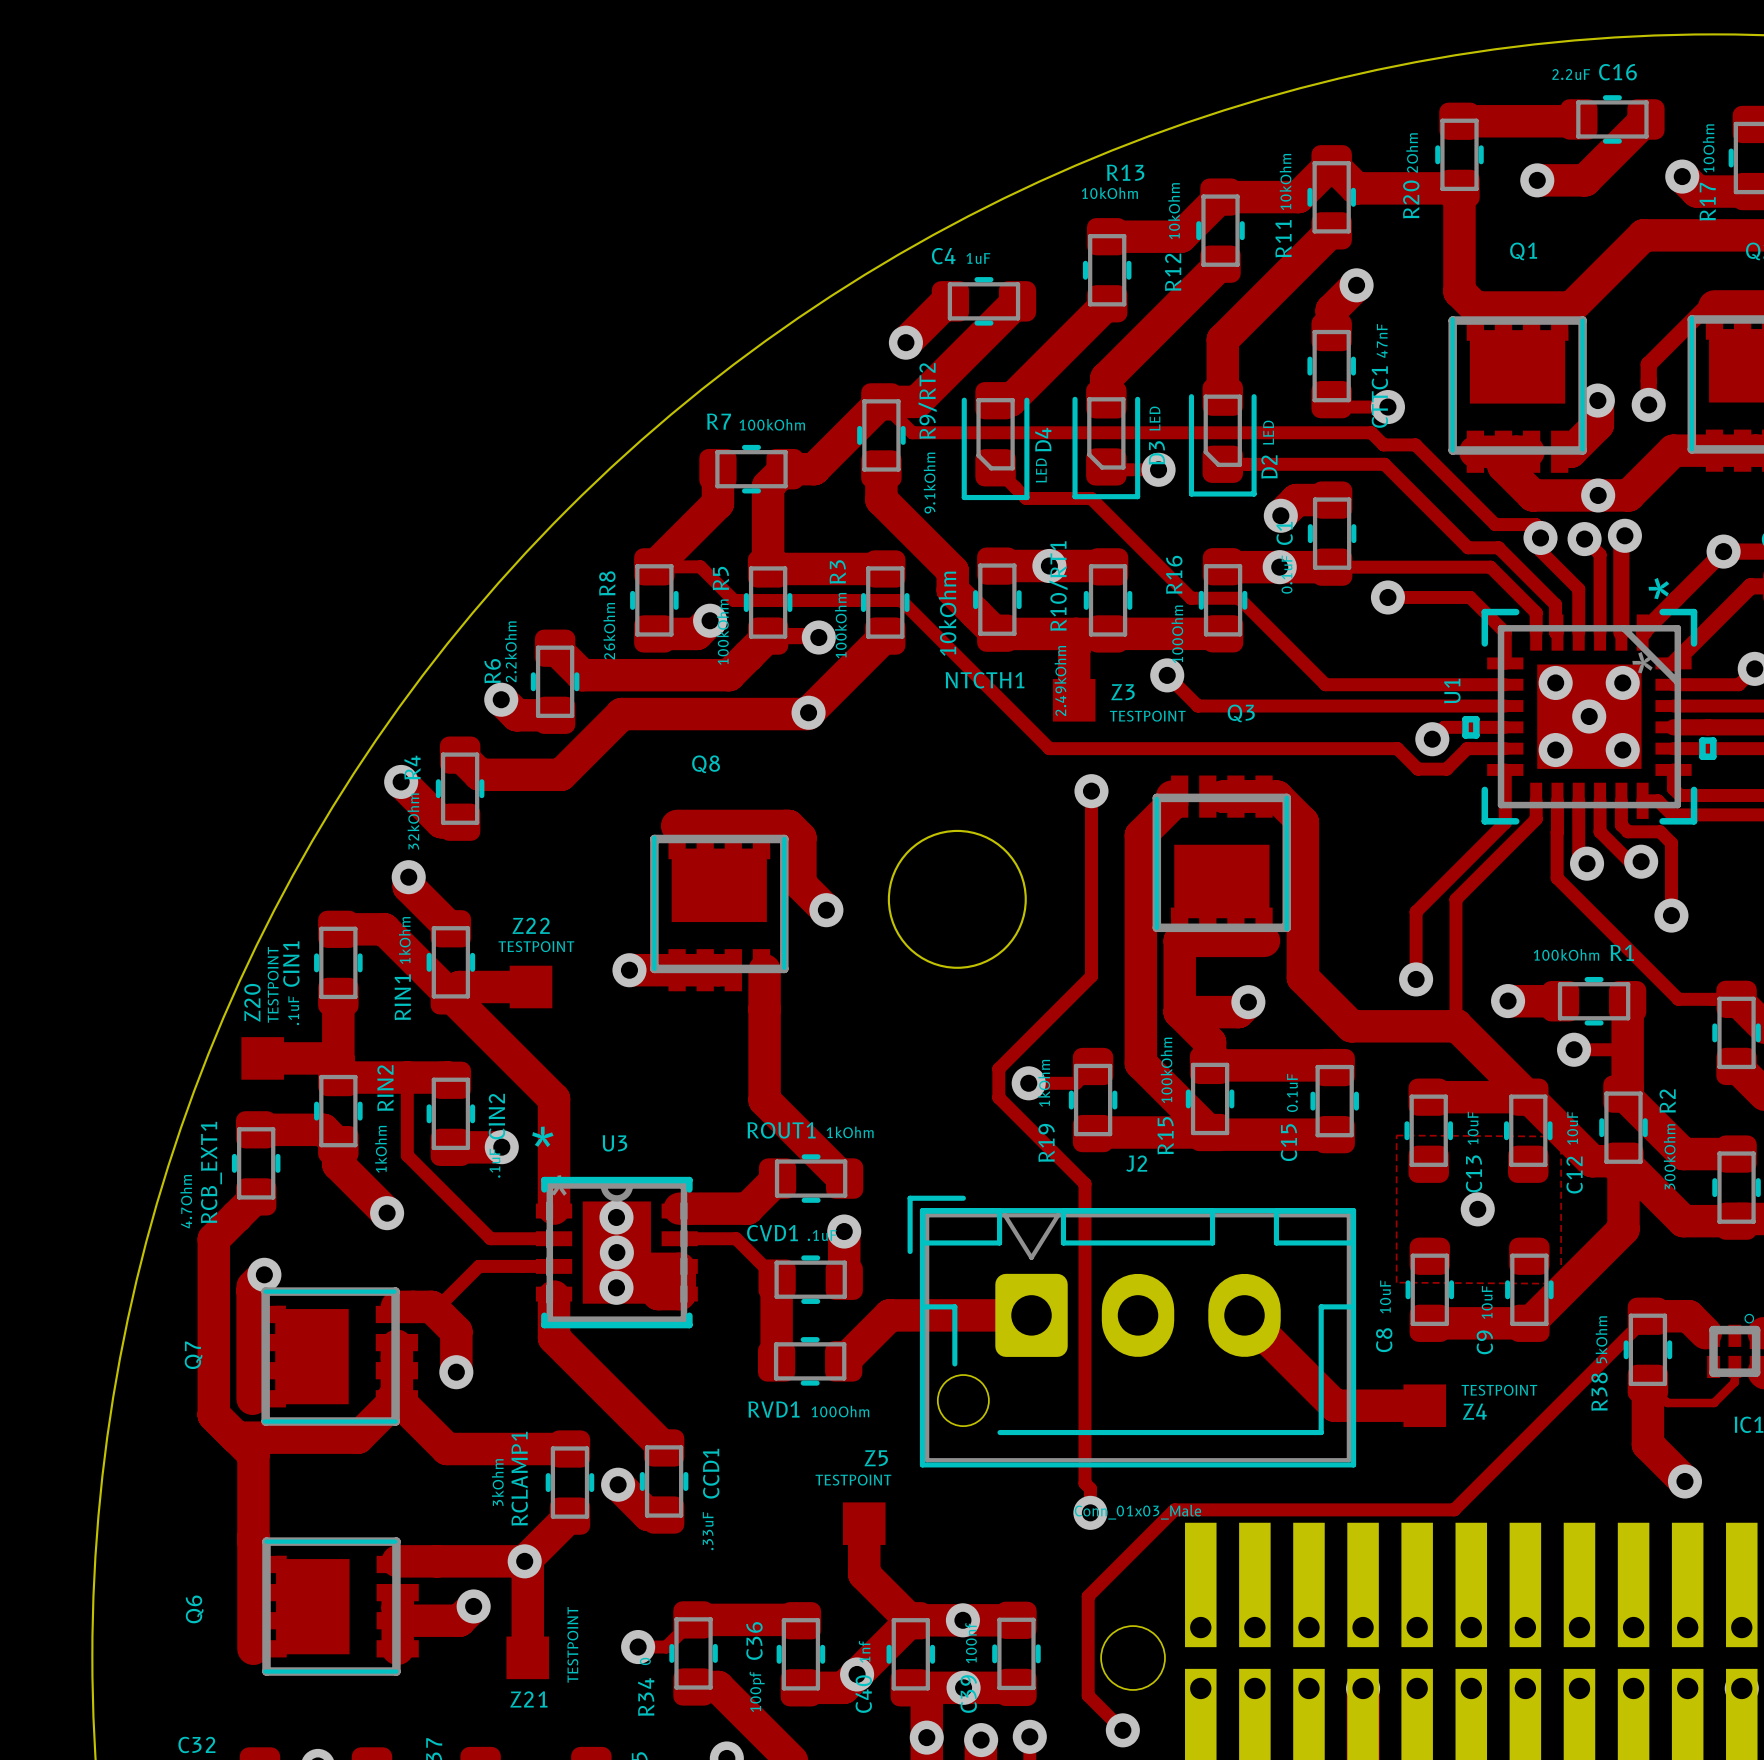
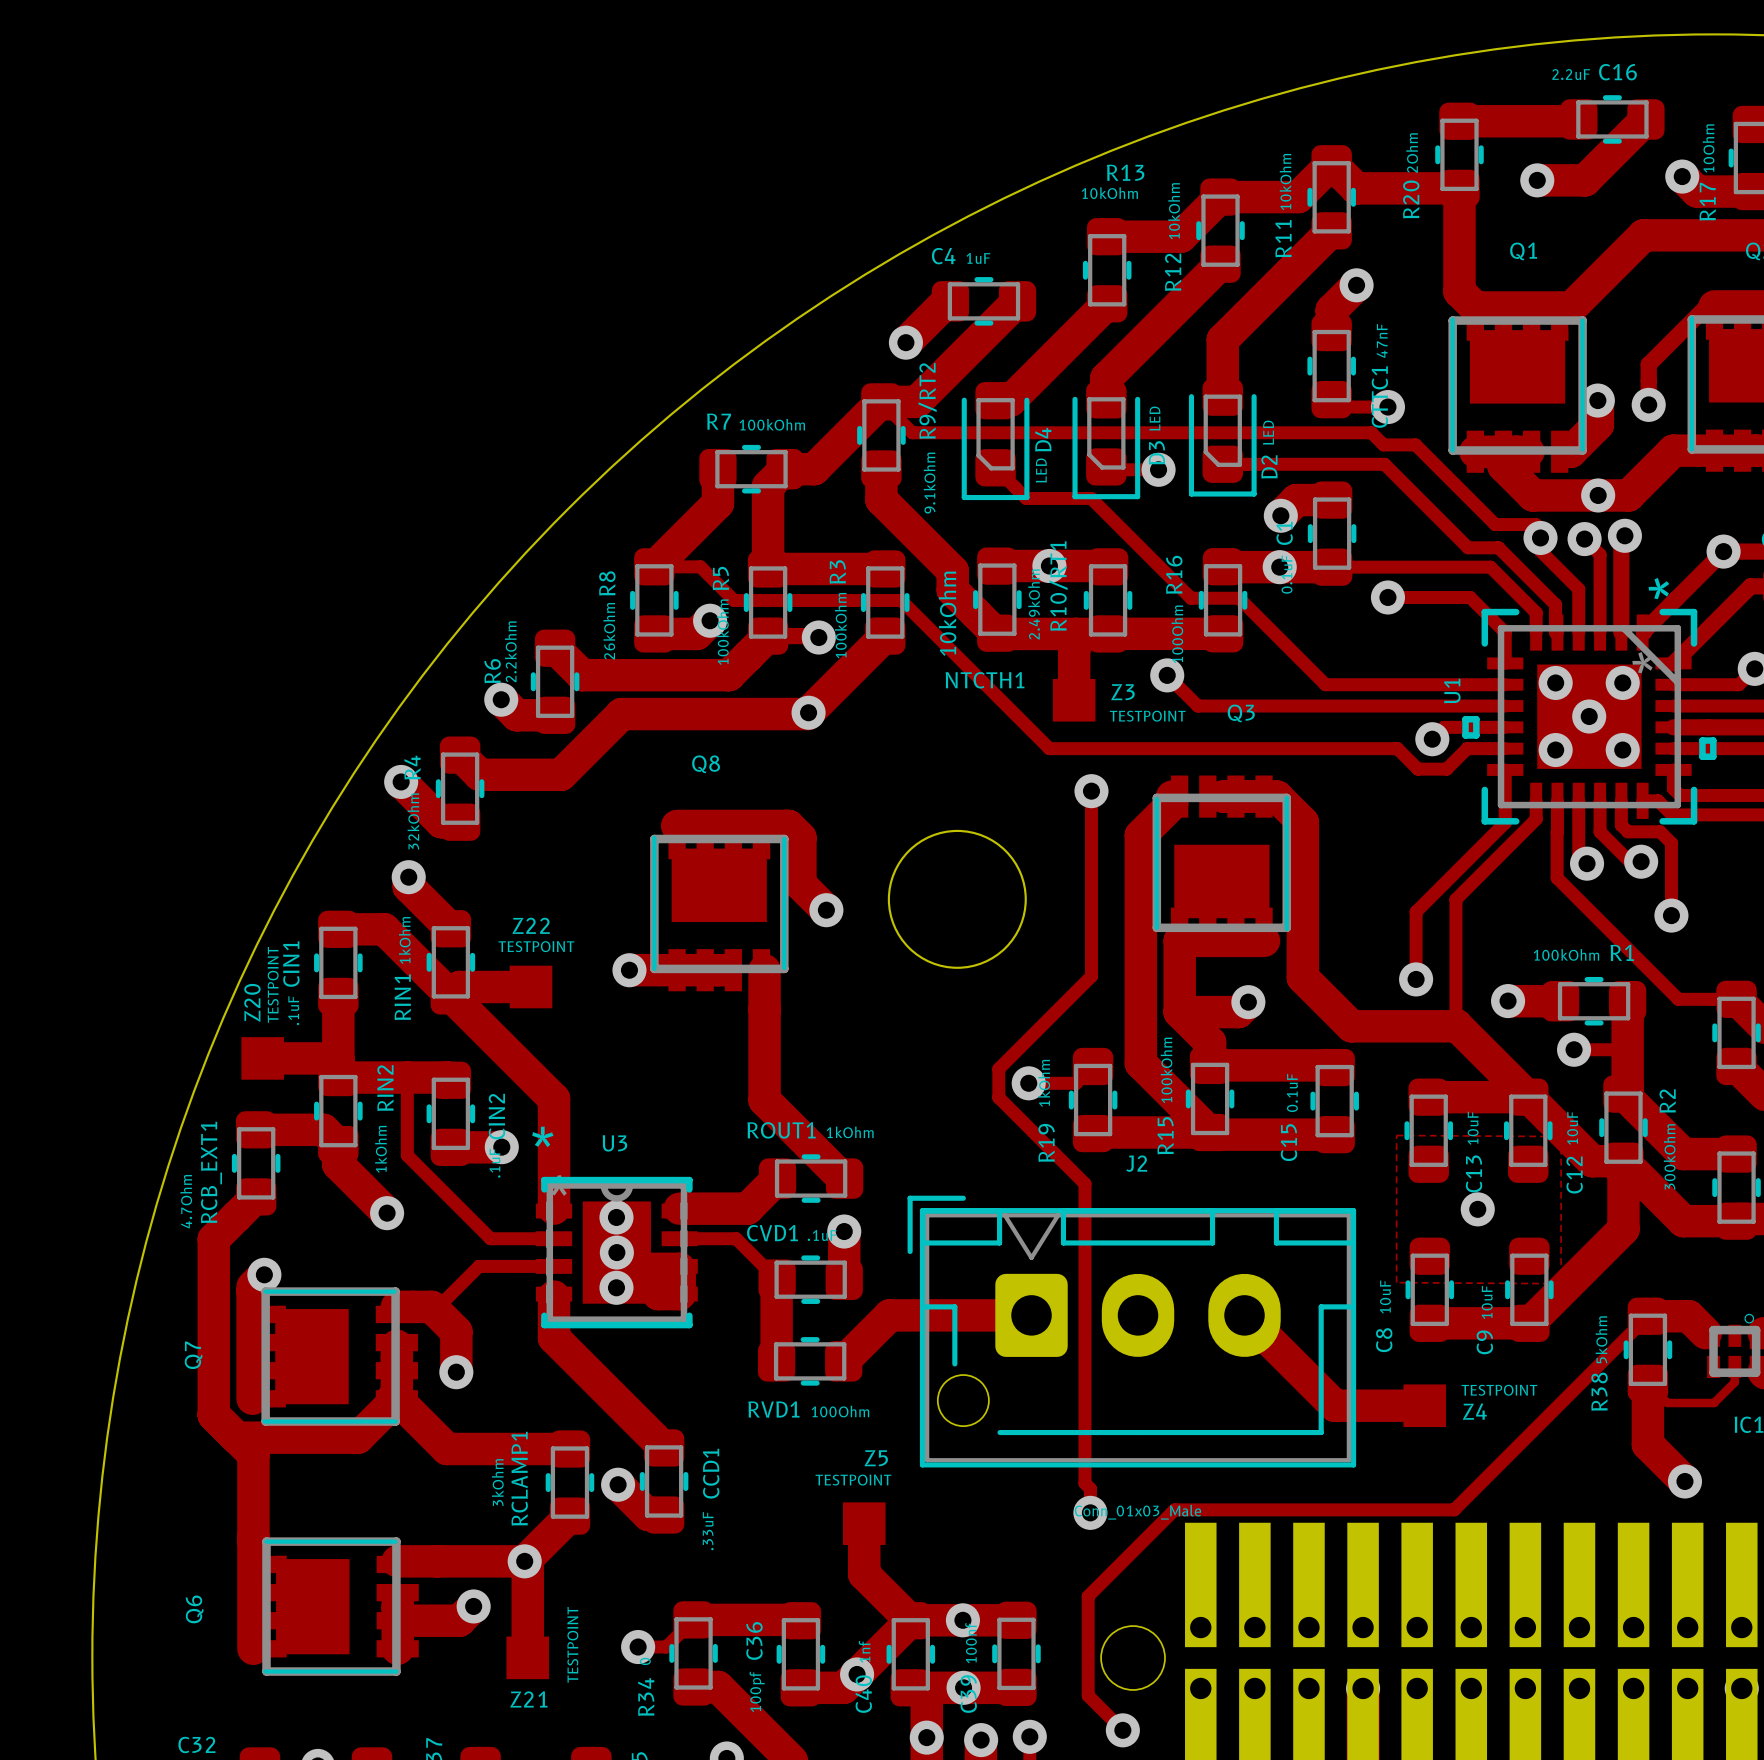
R10/RT1 value position: 2.49kOhm (1060, 681) -> 2.49kOhm (1034, 604)

